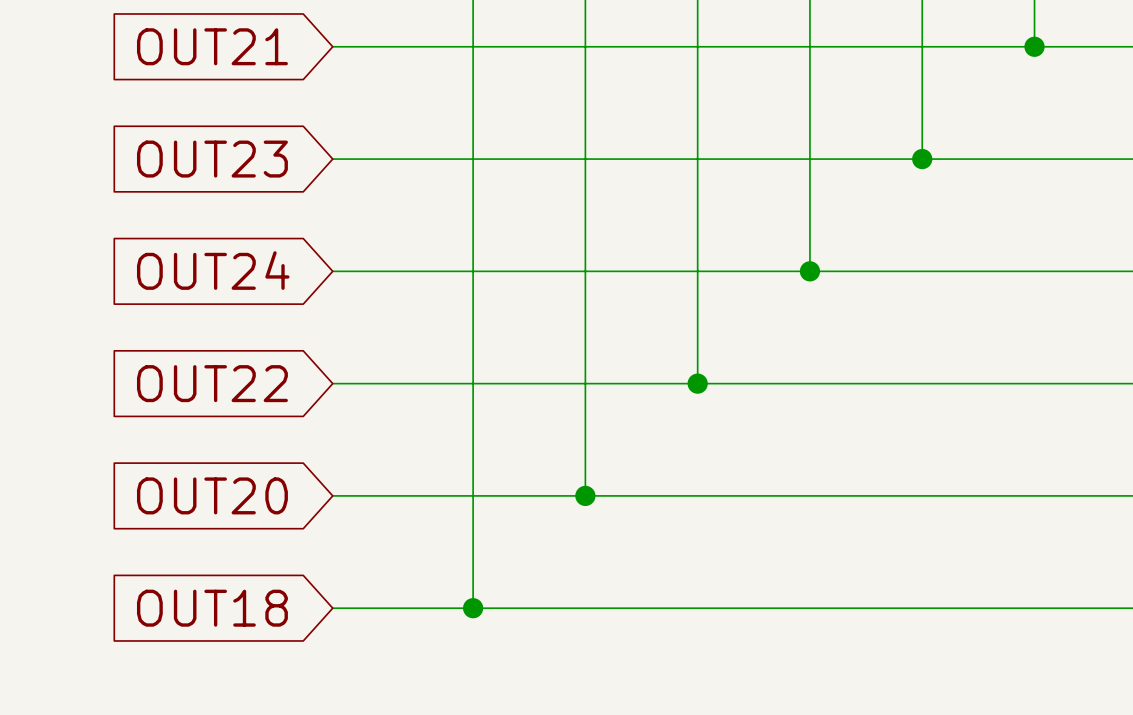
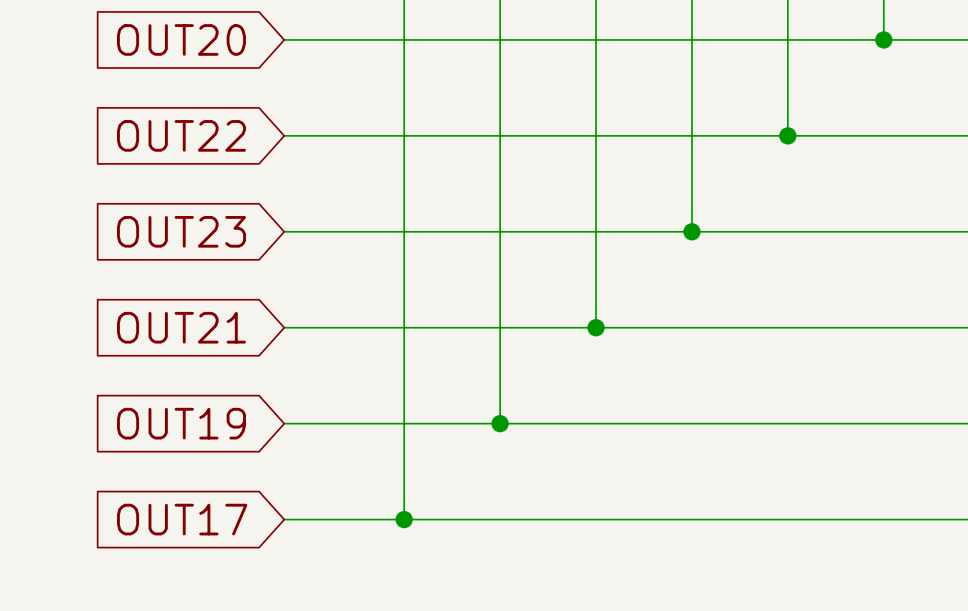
global label: OUT21 (212, 46) -> OUT20 (181, 39)
global label: OUT23 (212, 159) -> OUT22 (181, 135)
global label: OUT24 (213, 270) -> OUT23 (181, 231)
global label: OUT22 (212, 383) -> OUT21 (181, 327)
global label: OUT20 (212, 495) -> OUT19 (181, 423)
global label: OUT18 (212, 608) -> OUT17 (182, 519)

